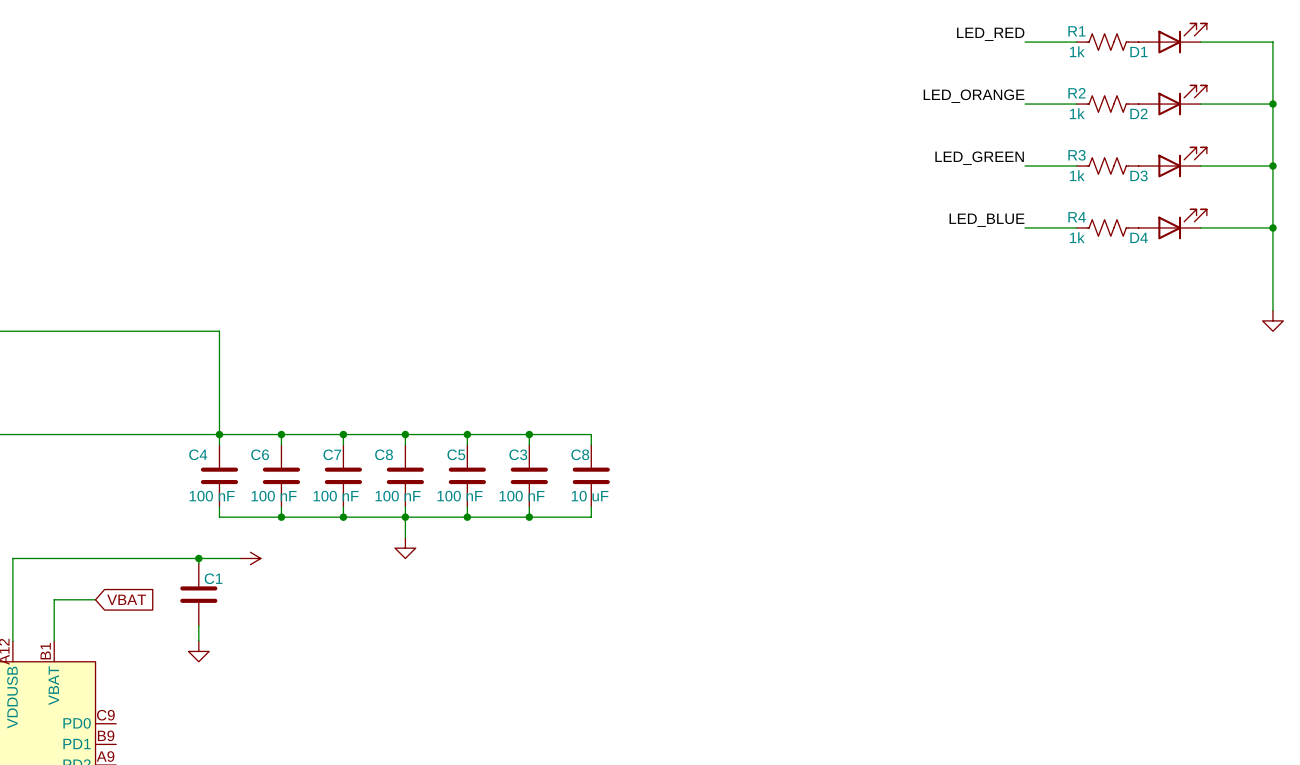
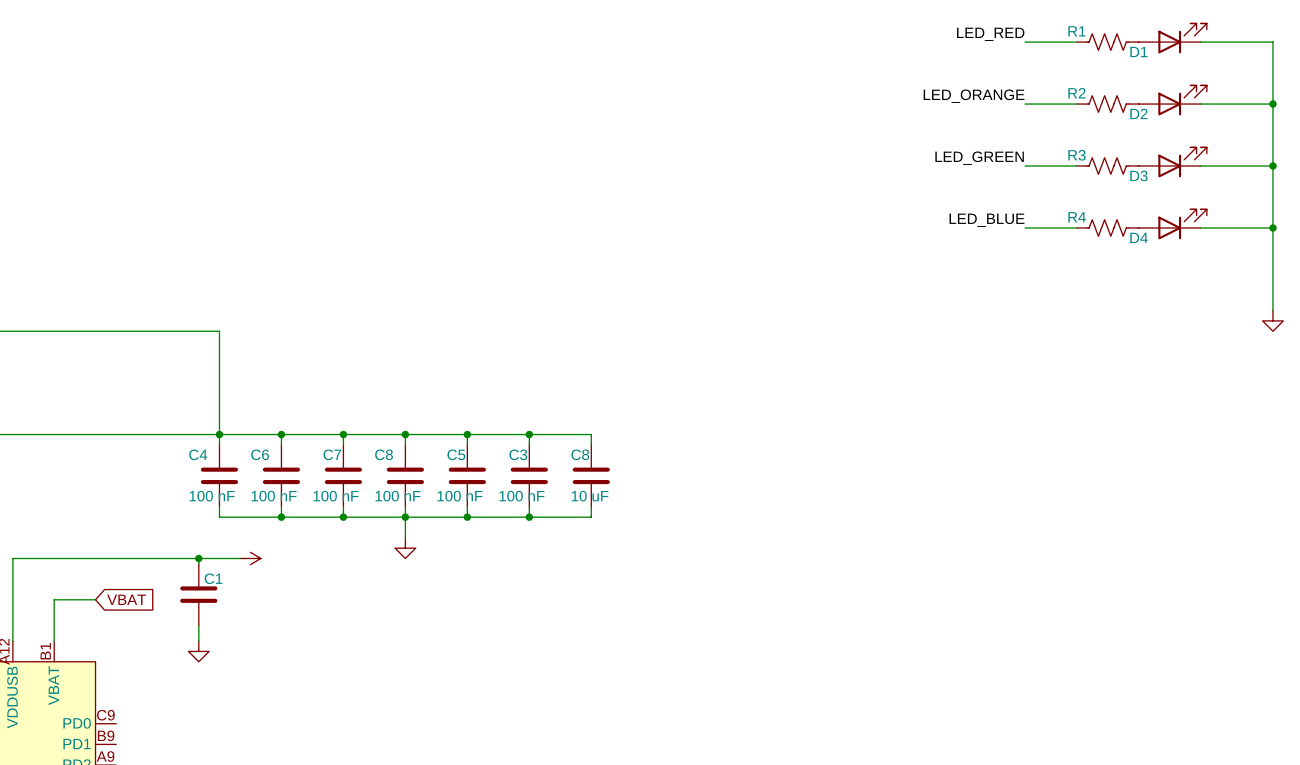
R1 value: 1k (1077, 51) -> none
R2 value: 1k (1077, 113) -> none
R3 value: 1k (1077, 175) -> none
R4 value: 1k (1077, 237) -> none

